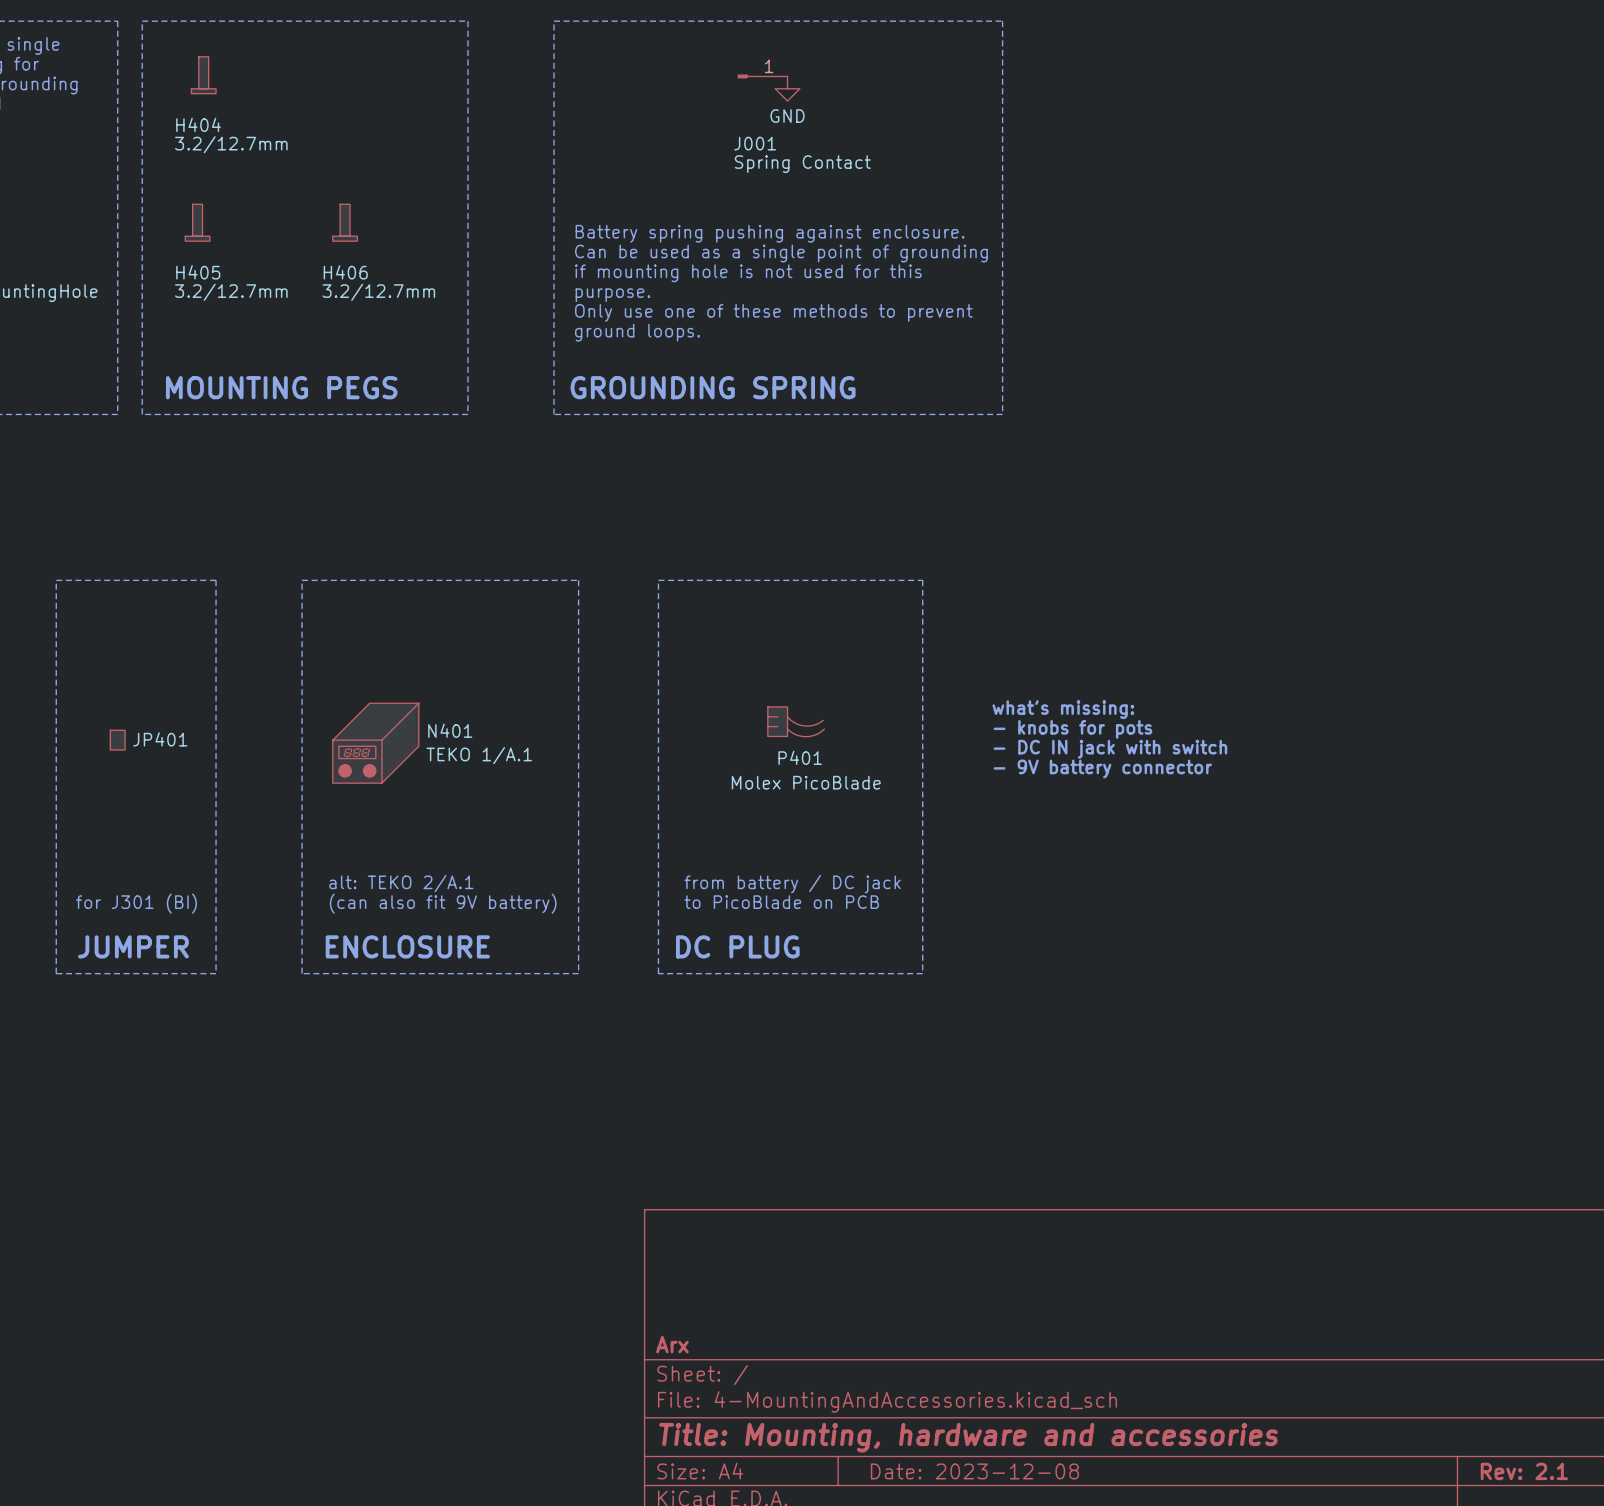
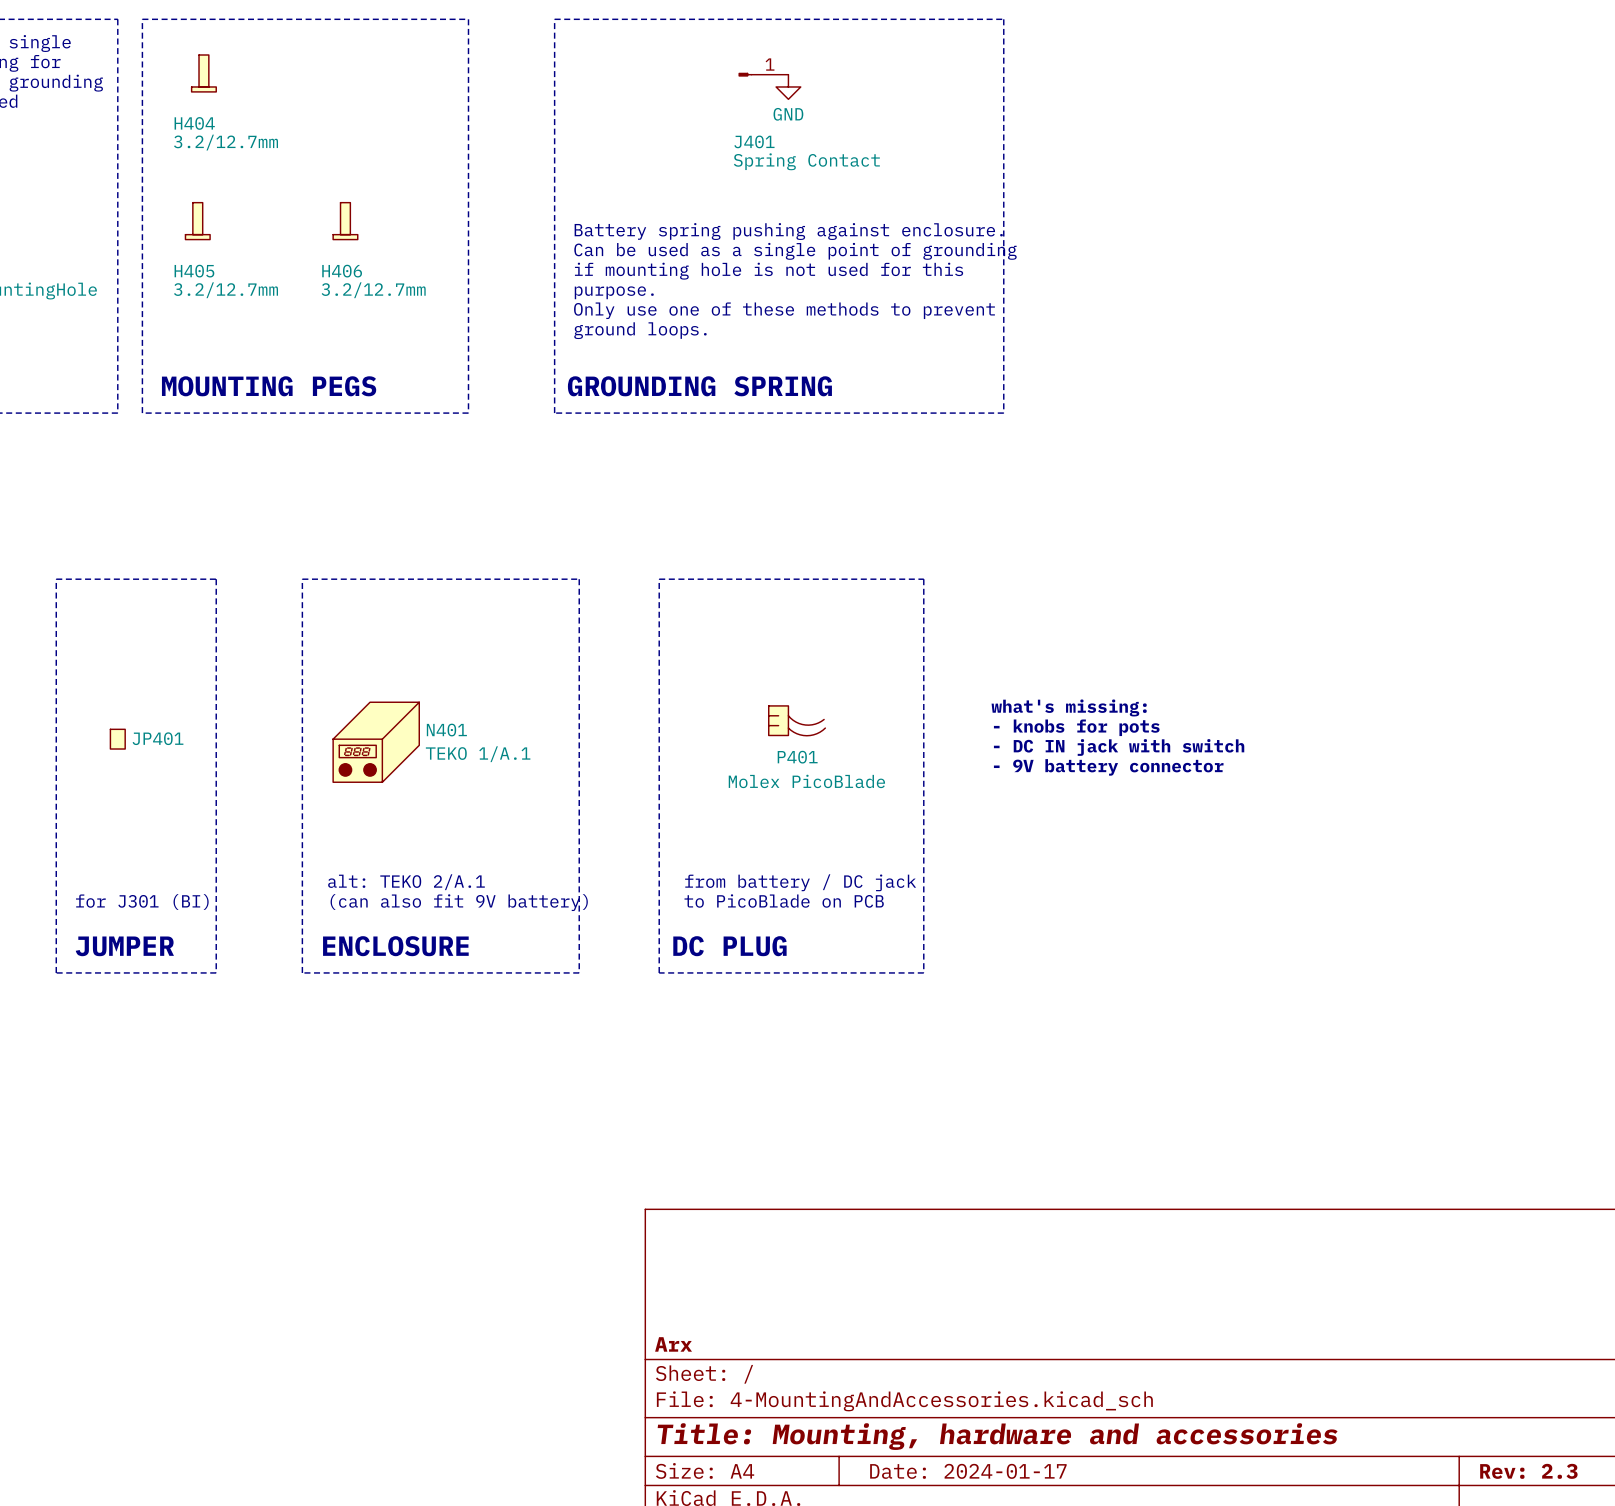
J001 name: J001 (755, 143) -> J401 (754, 141)
title block: Date: 2023-12-08 (974, 1471) -> Date: 2024-01-17 (968, 1471)
title block: Rev: 2.1 (1524, 1471) -> Rev: 2.3 (1528, 1471)

